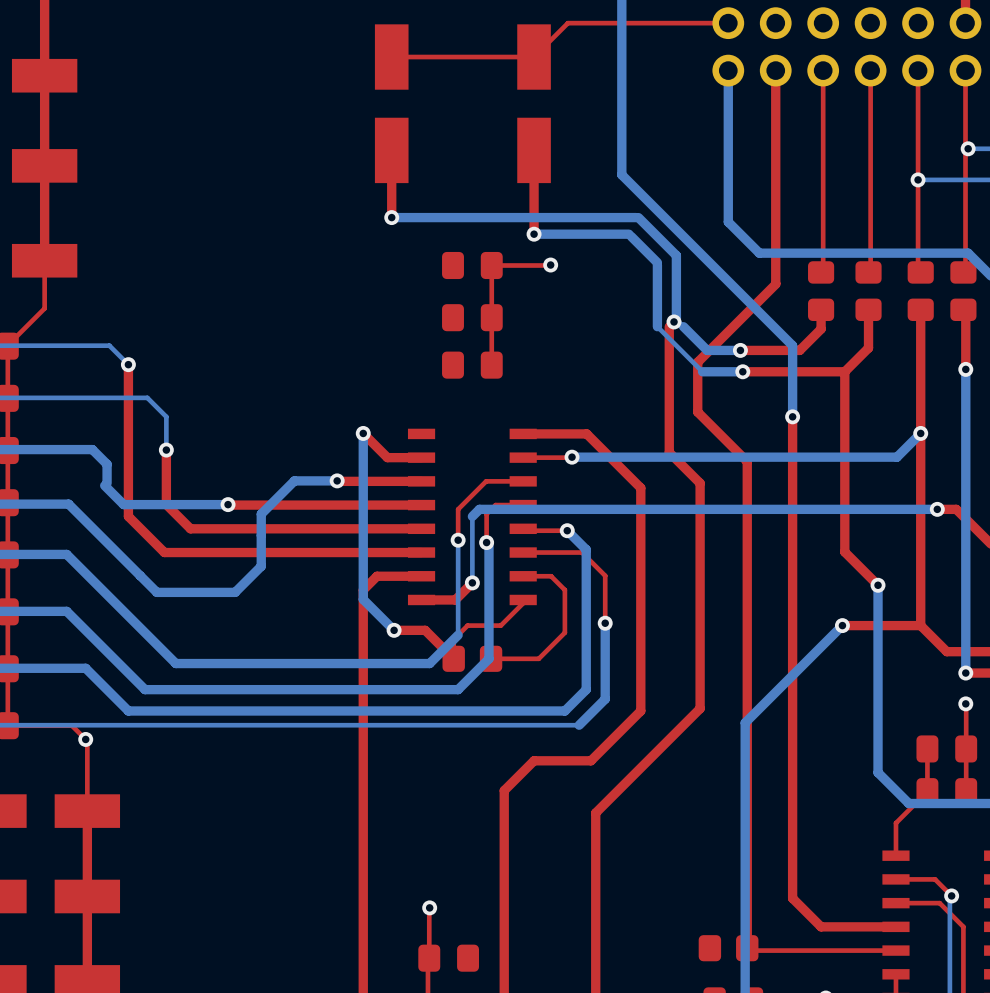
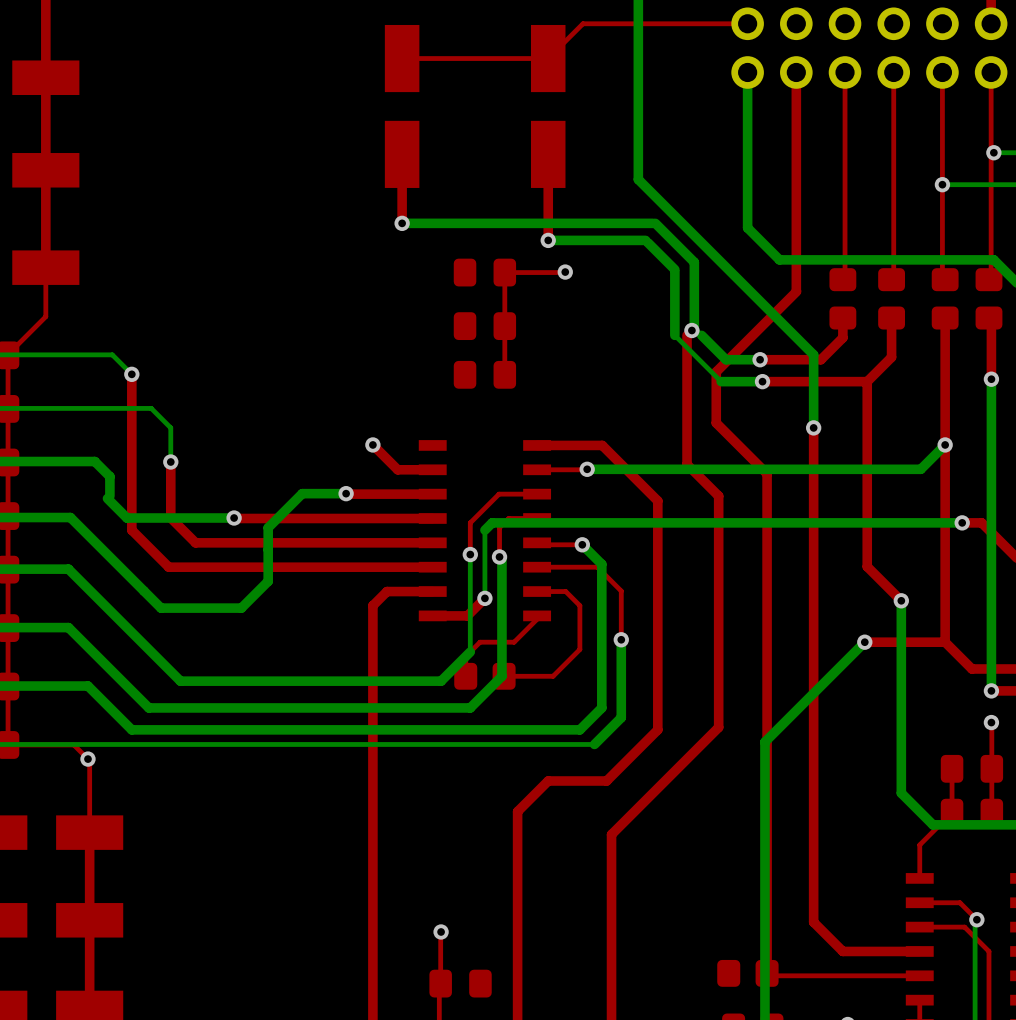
bottom track: (363, 433) (363, 599) (394, 630) -> none
top track: (394, 630) (425, 630) (453, 658) -> none
via: (394, 630) -> none

